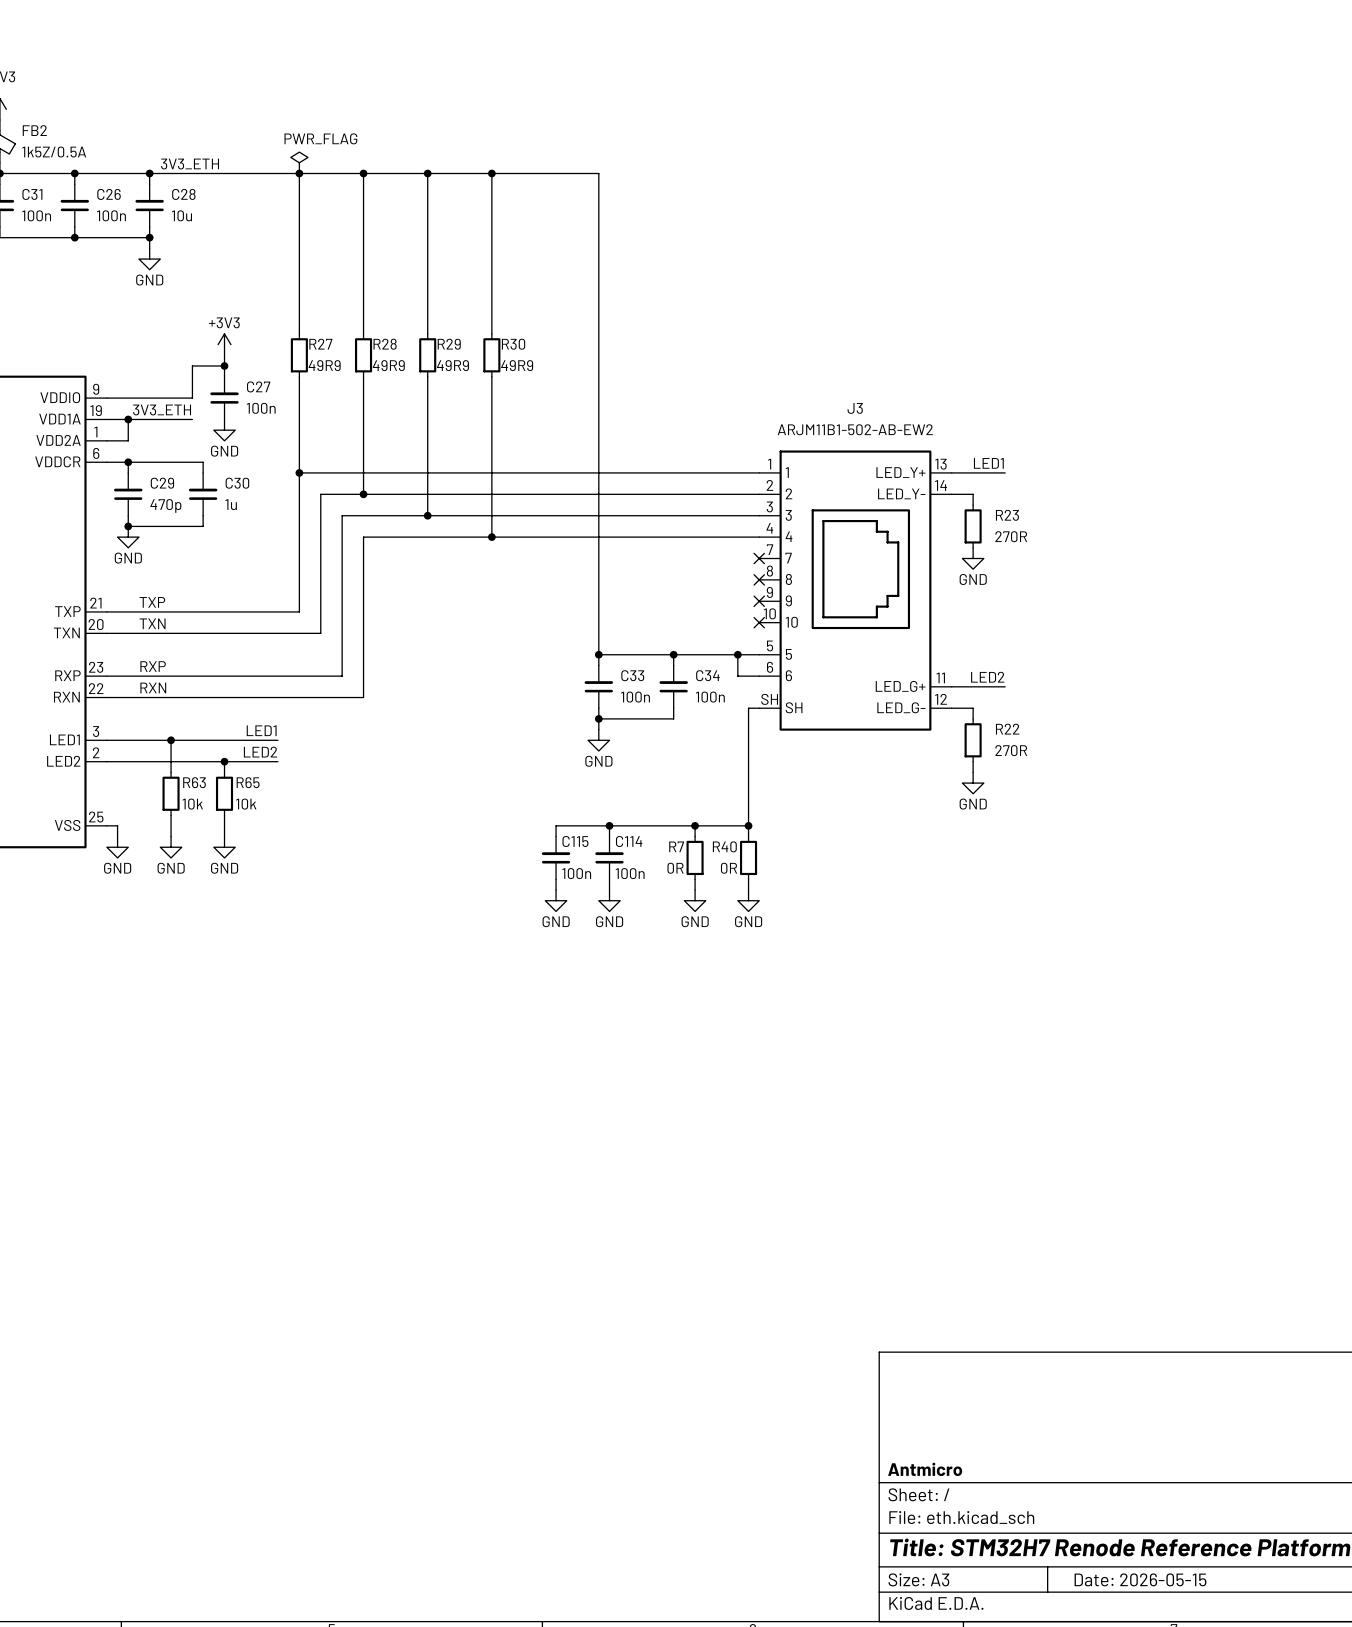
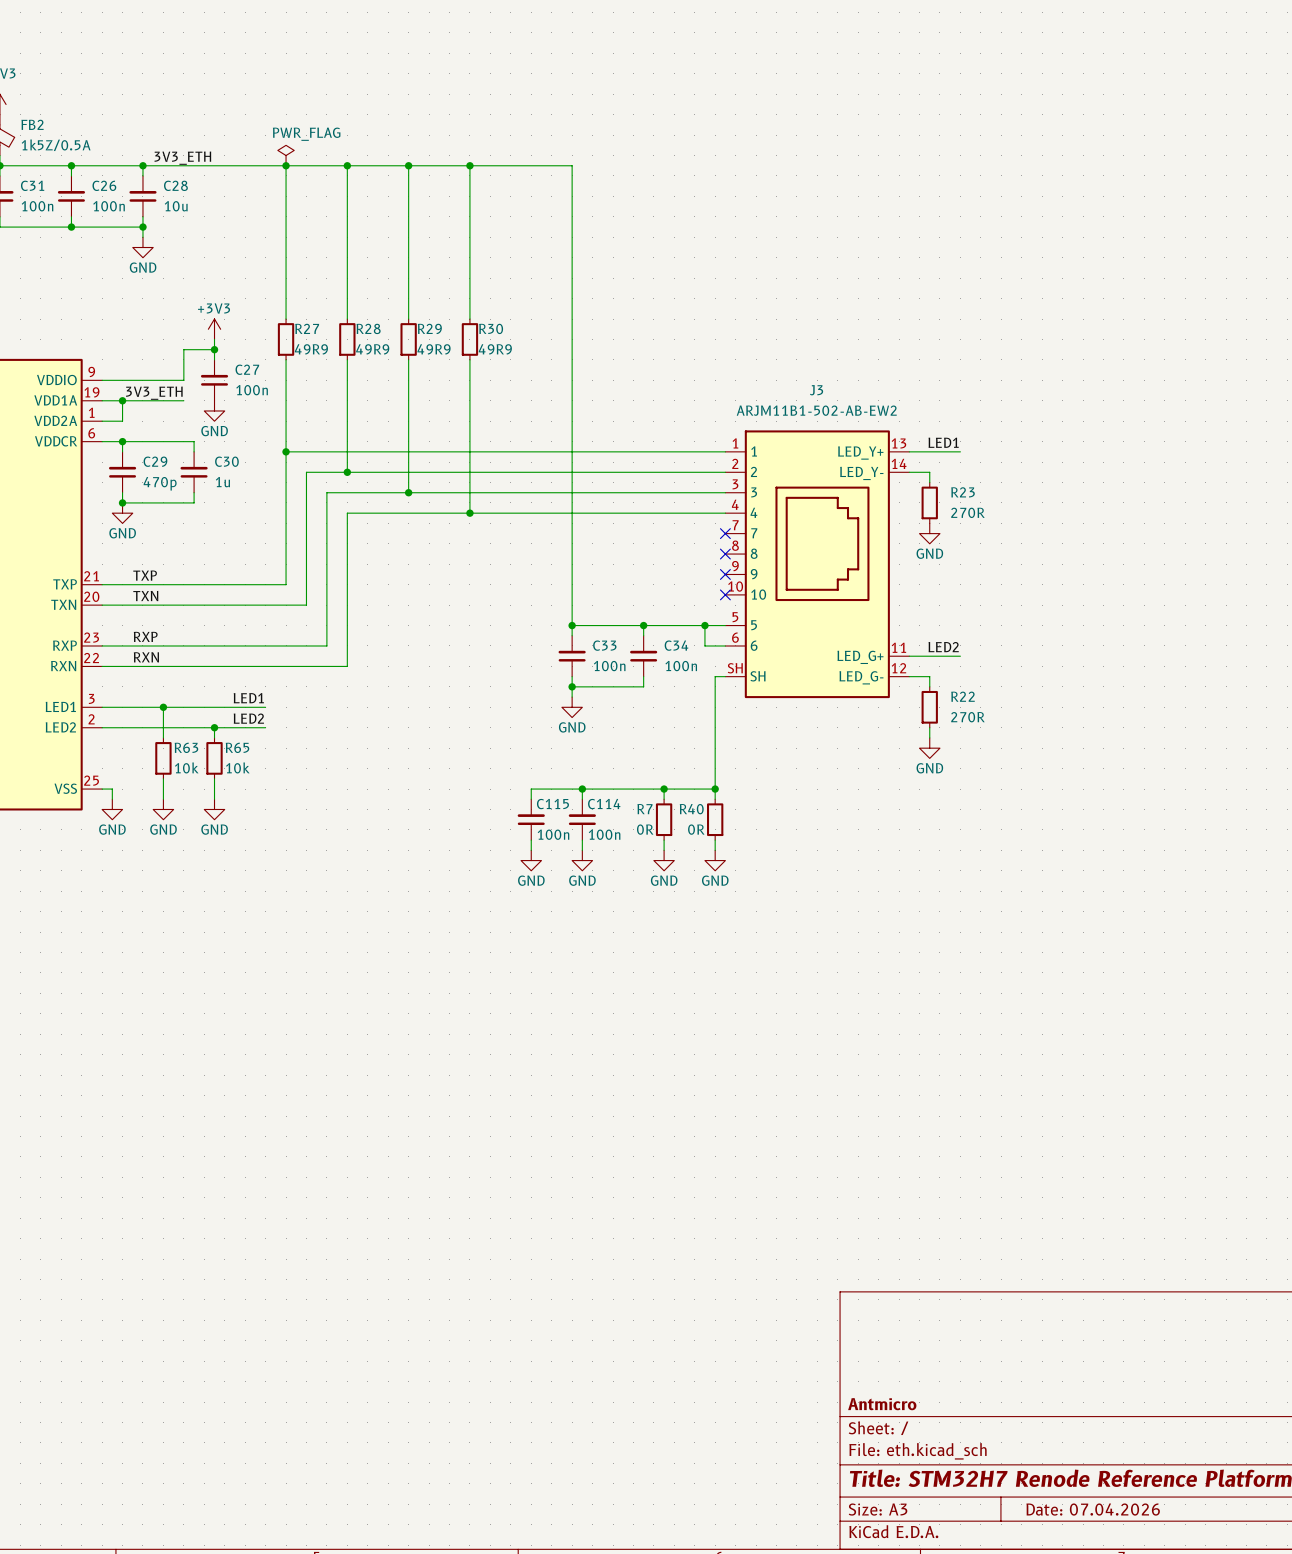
title block: Date: 2026-05-15 (1140, 1579) -> Date: 07.04.2026 (1093, 1509)

